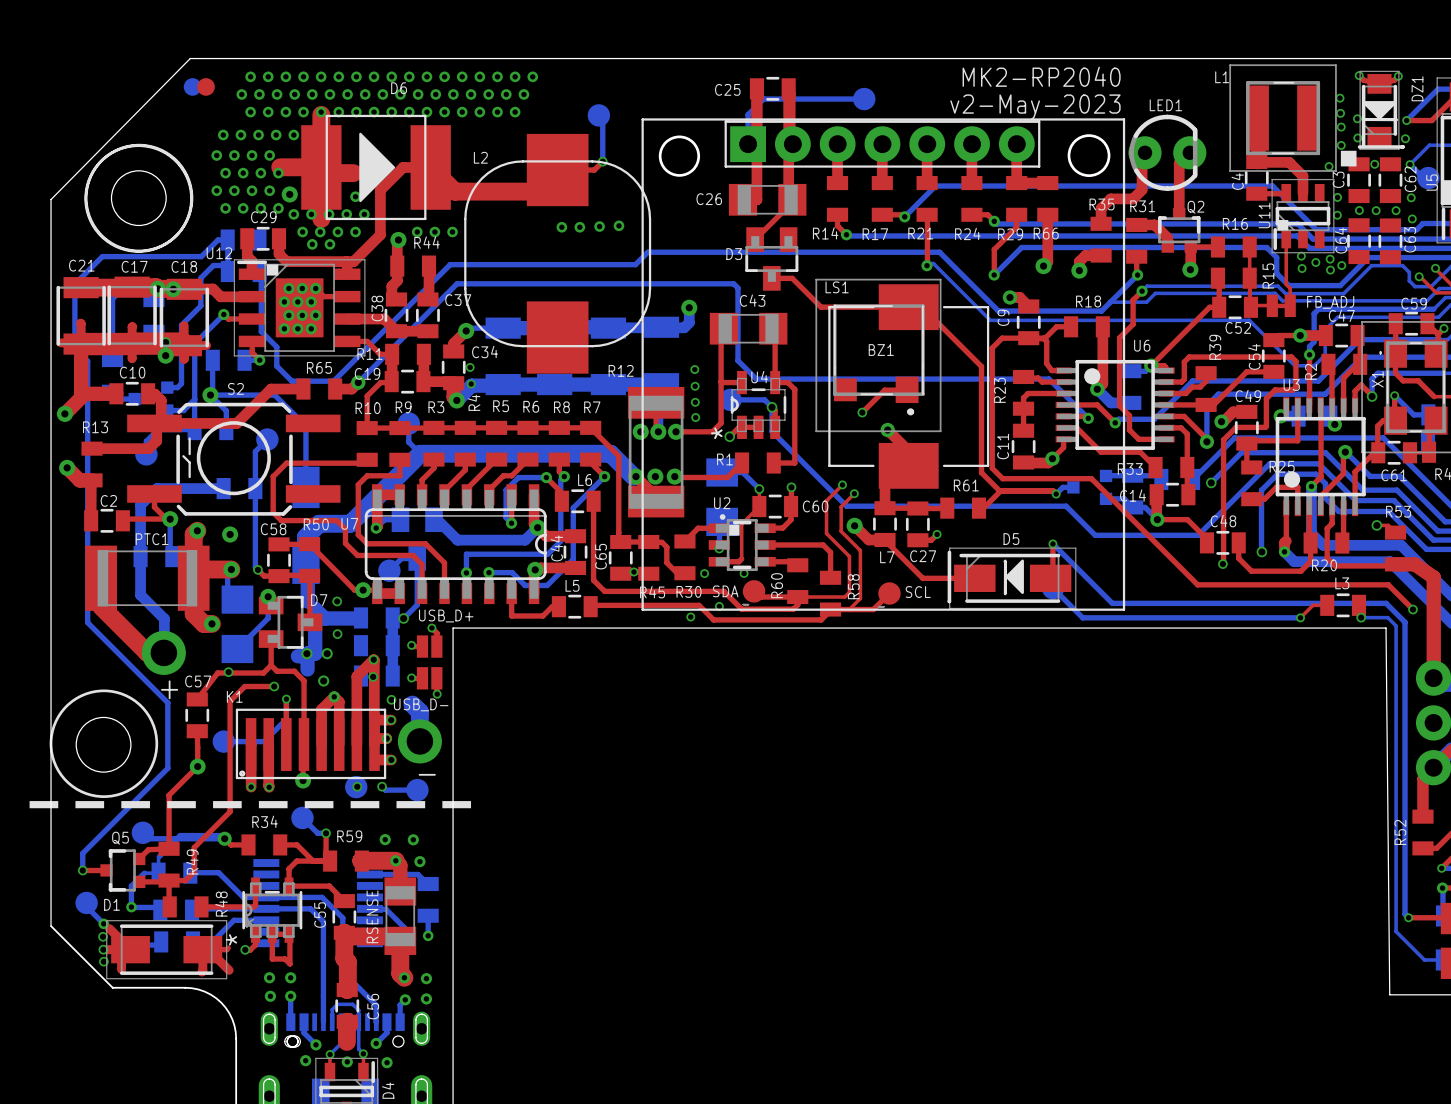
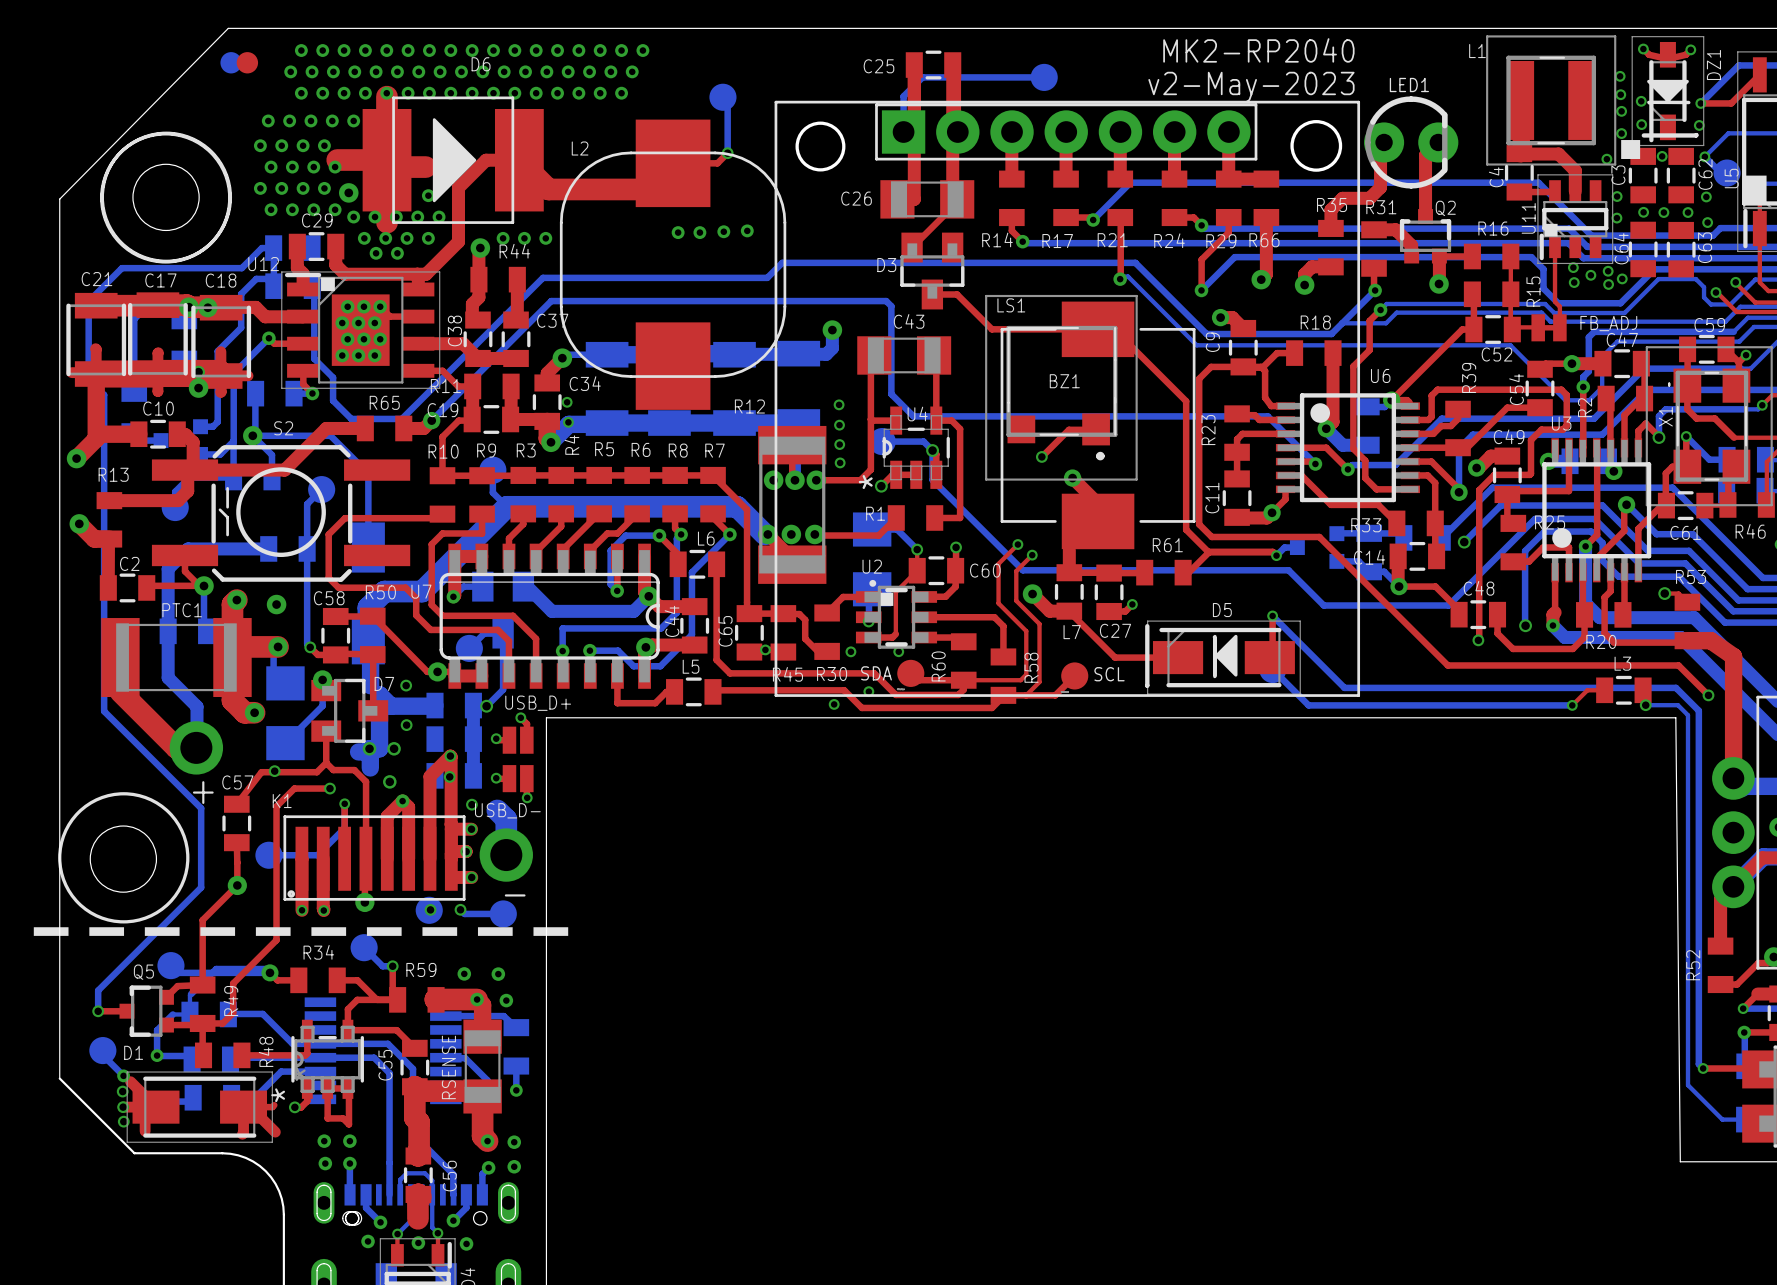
DZ1 footprint: [1359, 70, 1400, 150] -> [1631, 36, 1705, 147]

